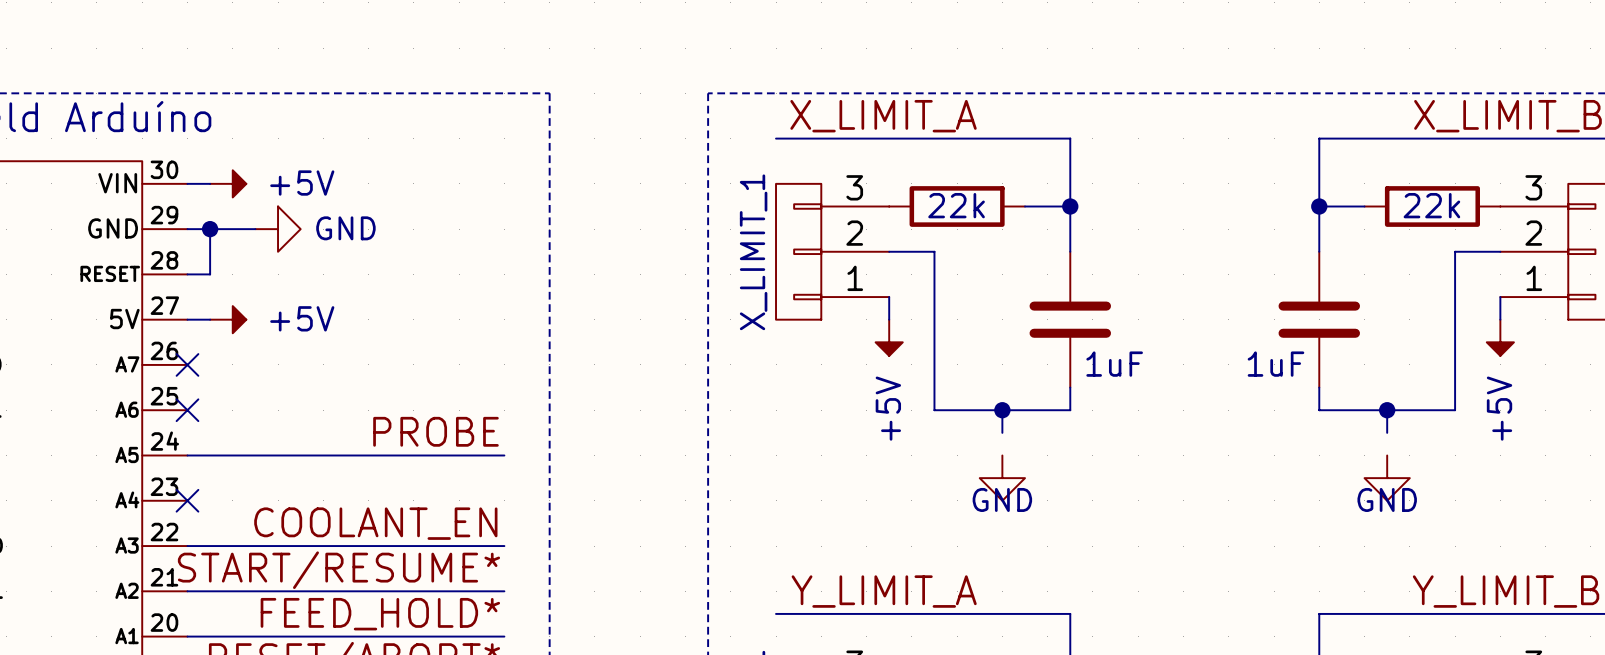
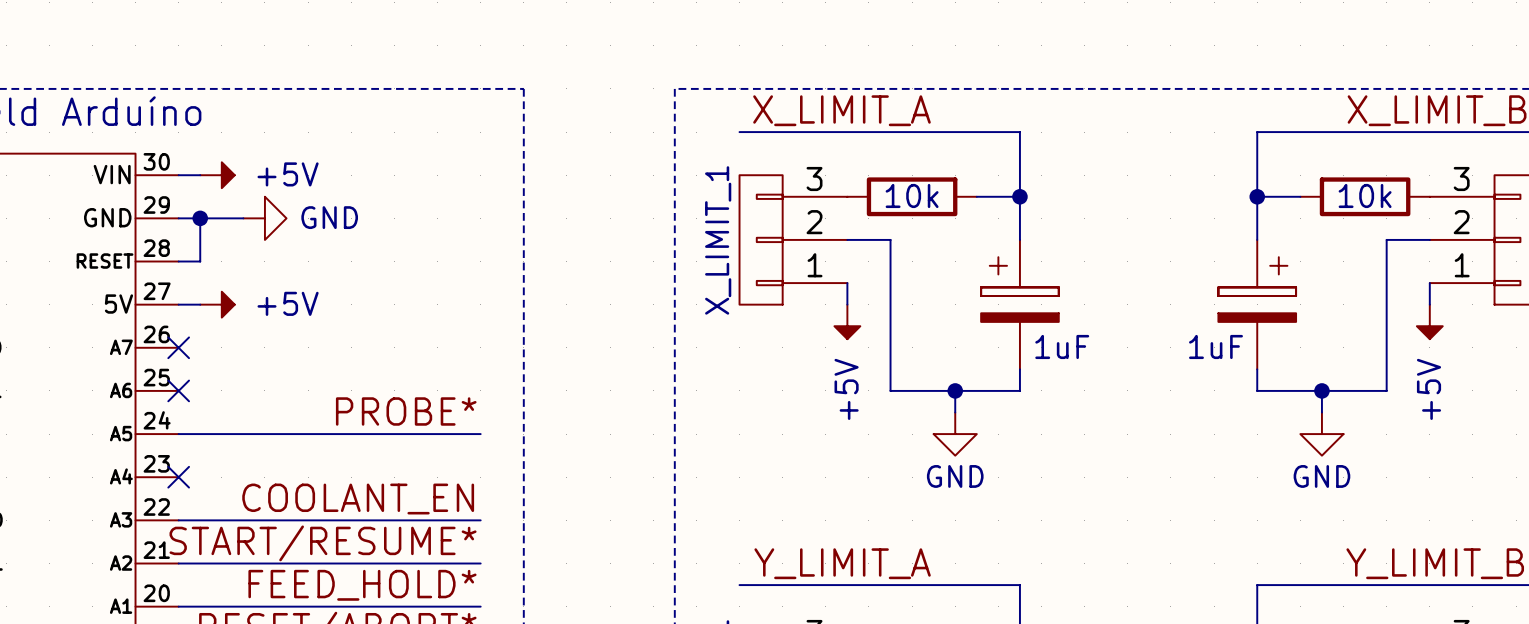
part value: 22k (956, 205) -> 10k (912, 195)
part value: 22k (1431, 205) -> 10k (1365, 195)
part symbol: [1029, 251, 1112, 388] -> [981, 239, 1059, 370]
part symbol: [1278, 251, 1361, 388] -> [1218, 239, 1297, 370]
label: PROBE (435, 431) -> PROBE* (406, 411)
power symbol: none -> GND (955, 434)
power symbol: none -> GND (1321, 434)
power symbol: GND (1002, 478) -> none
power symbol: GND (1387, 478) -> none

